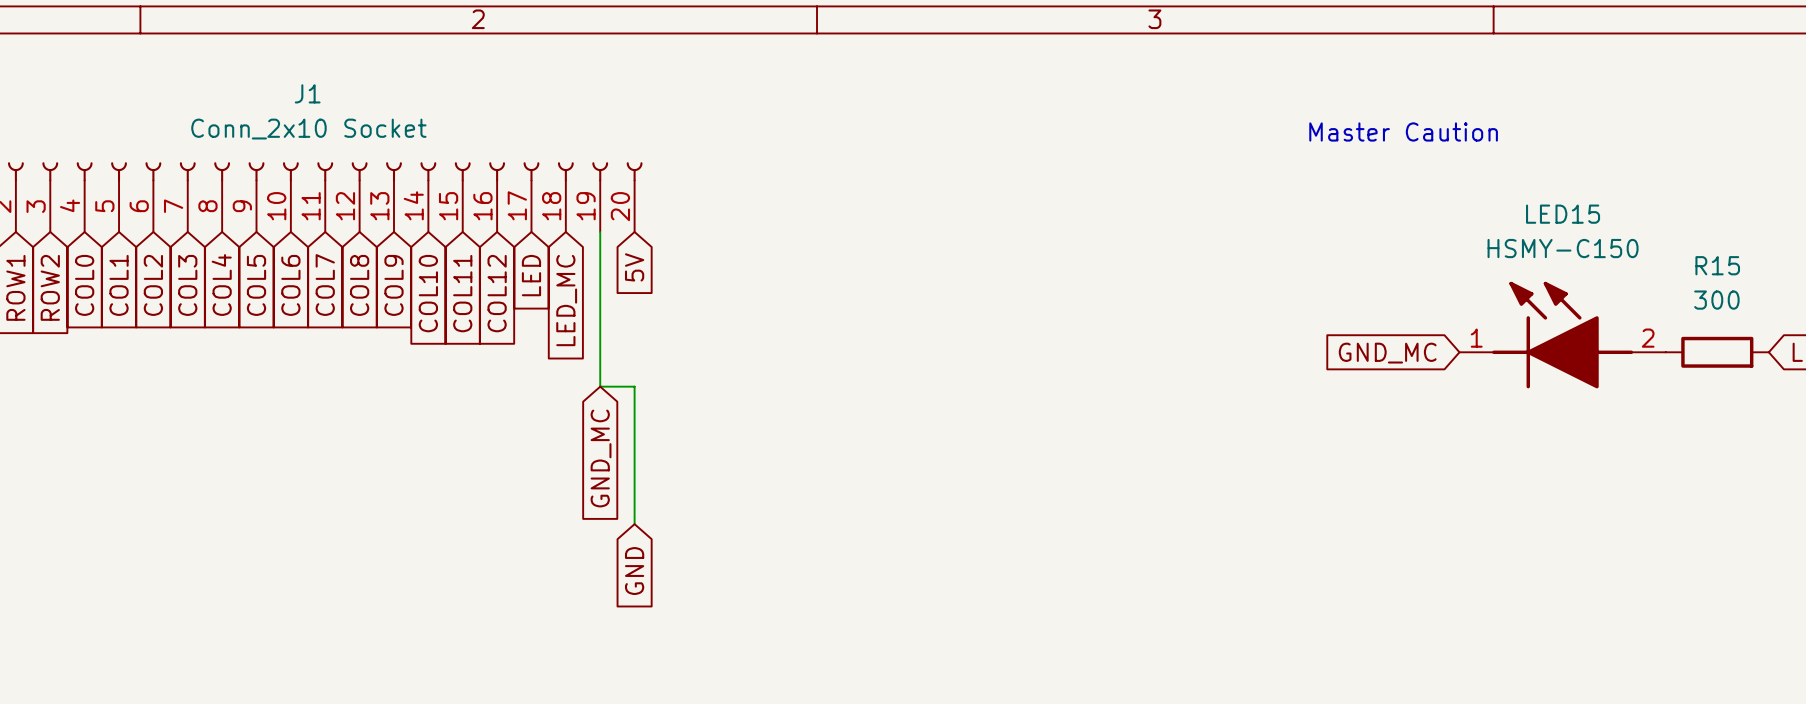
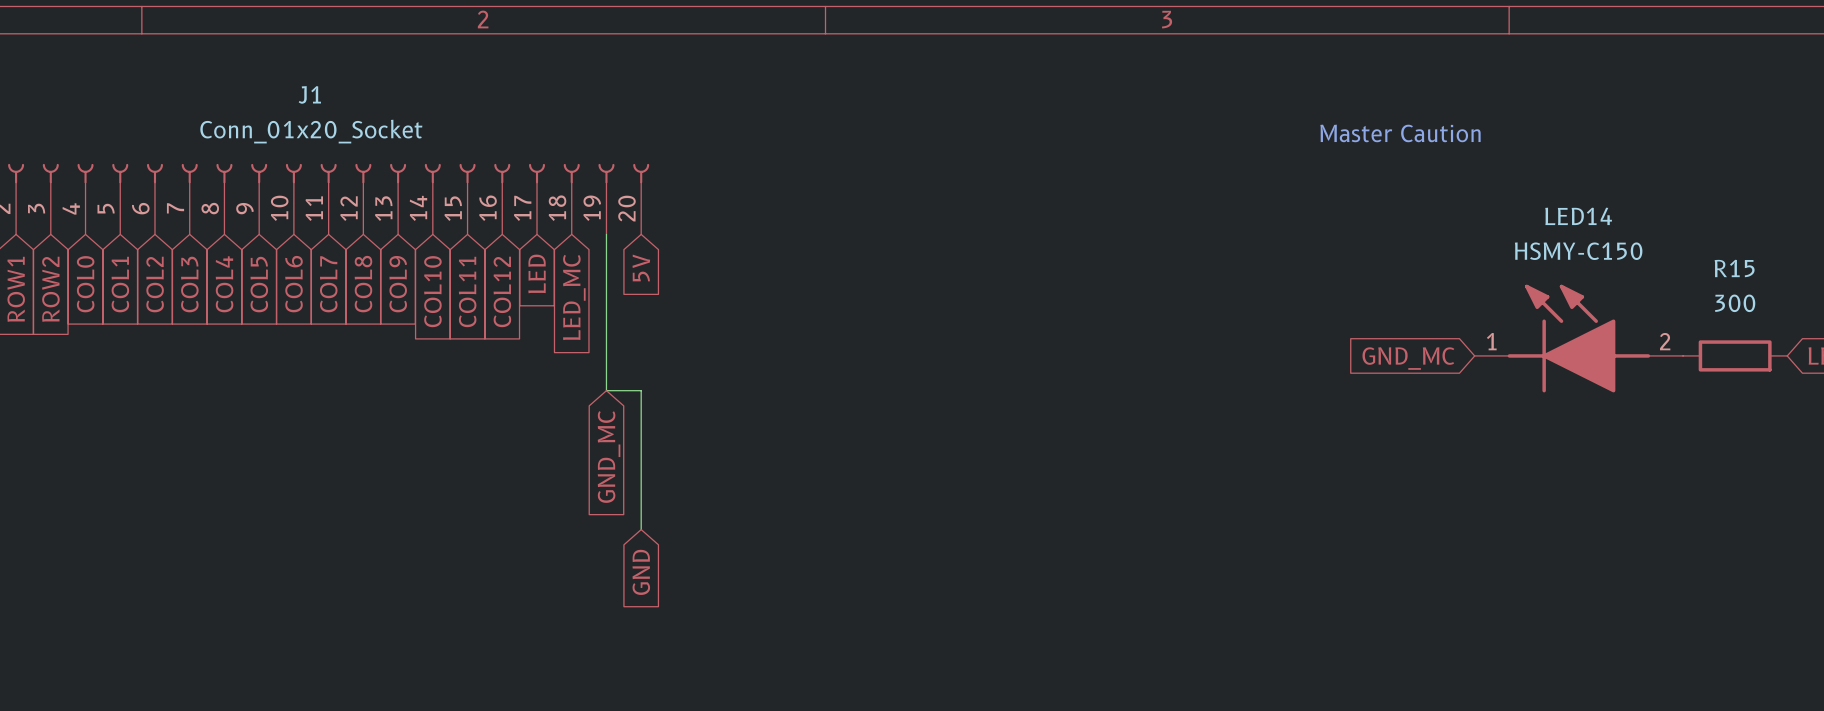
J1 value: Conn_2x10 Socket (308, 129) -> Conn_01x20_Socket (311, 131)
LED15 name: LED15 (1563, 214) -> LED14 (1578, 216)

